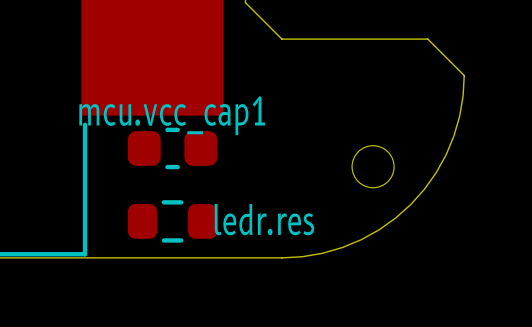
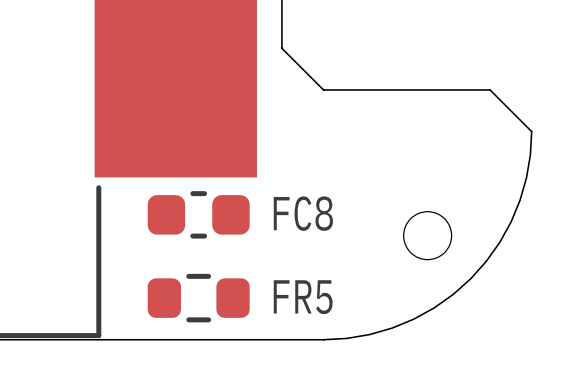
mcu.vcc_cap1 name: mcu.vcc_cap1 (172, 115) -> FC8 (303, 213)
ledr.res name: ledr.res (264, 219) -> FR5 (303, 297)

